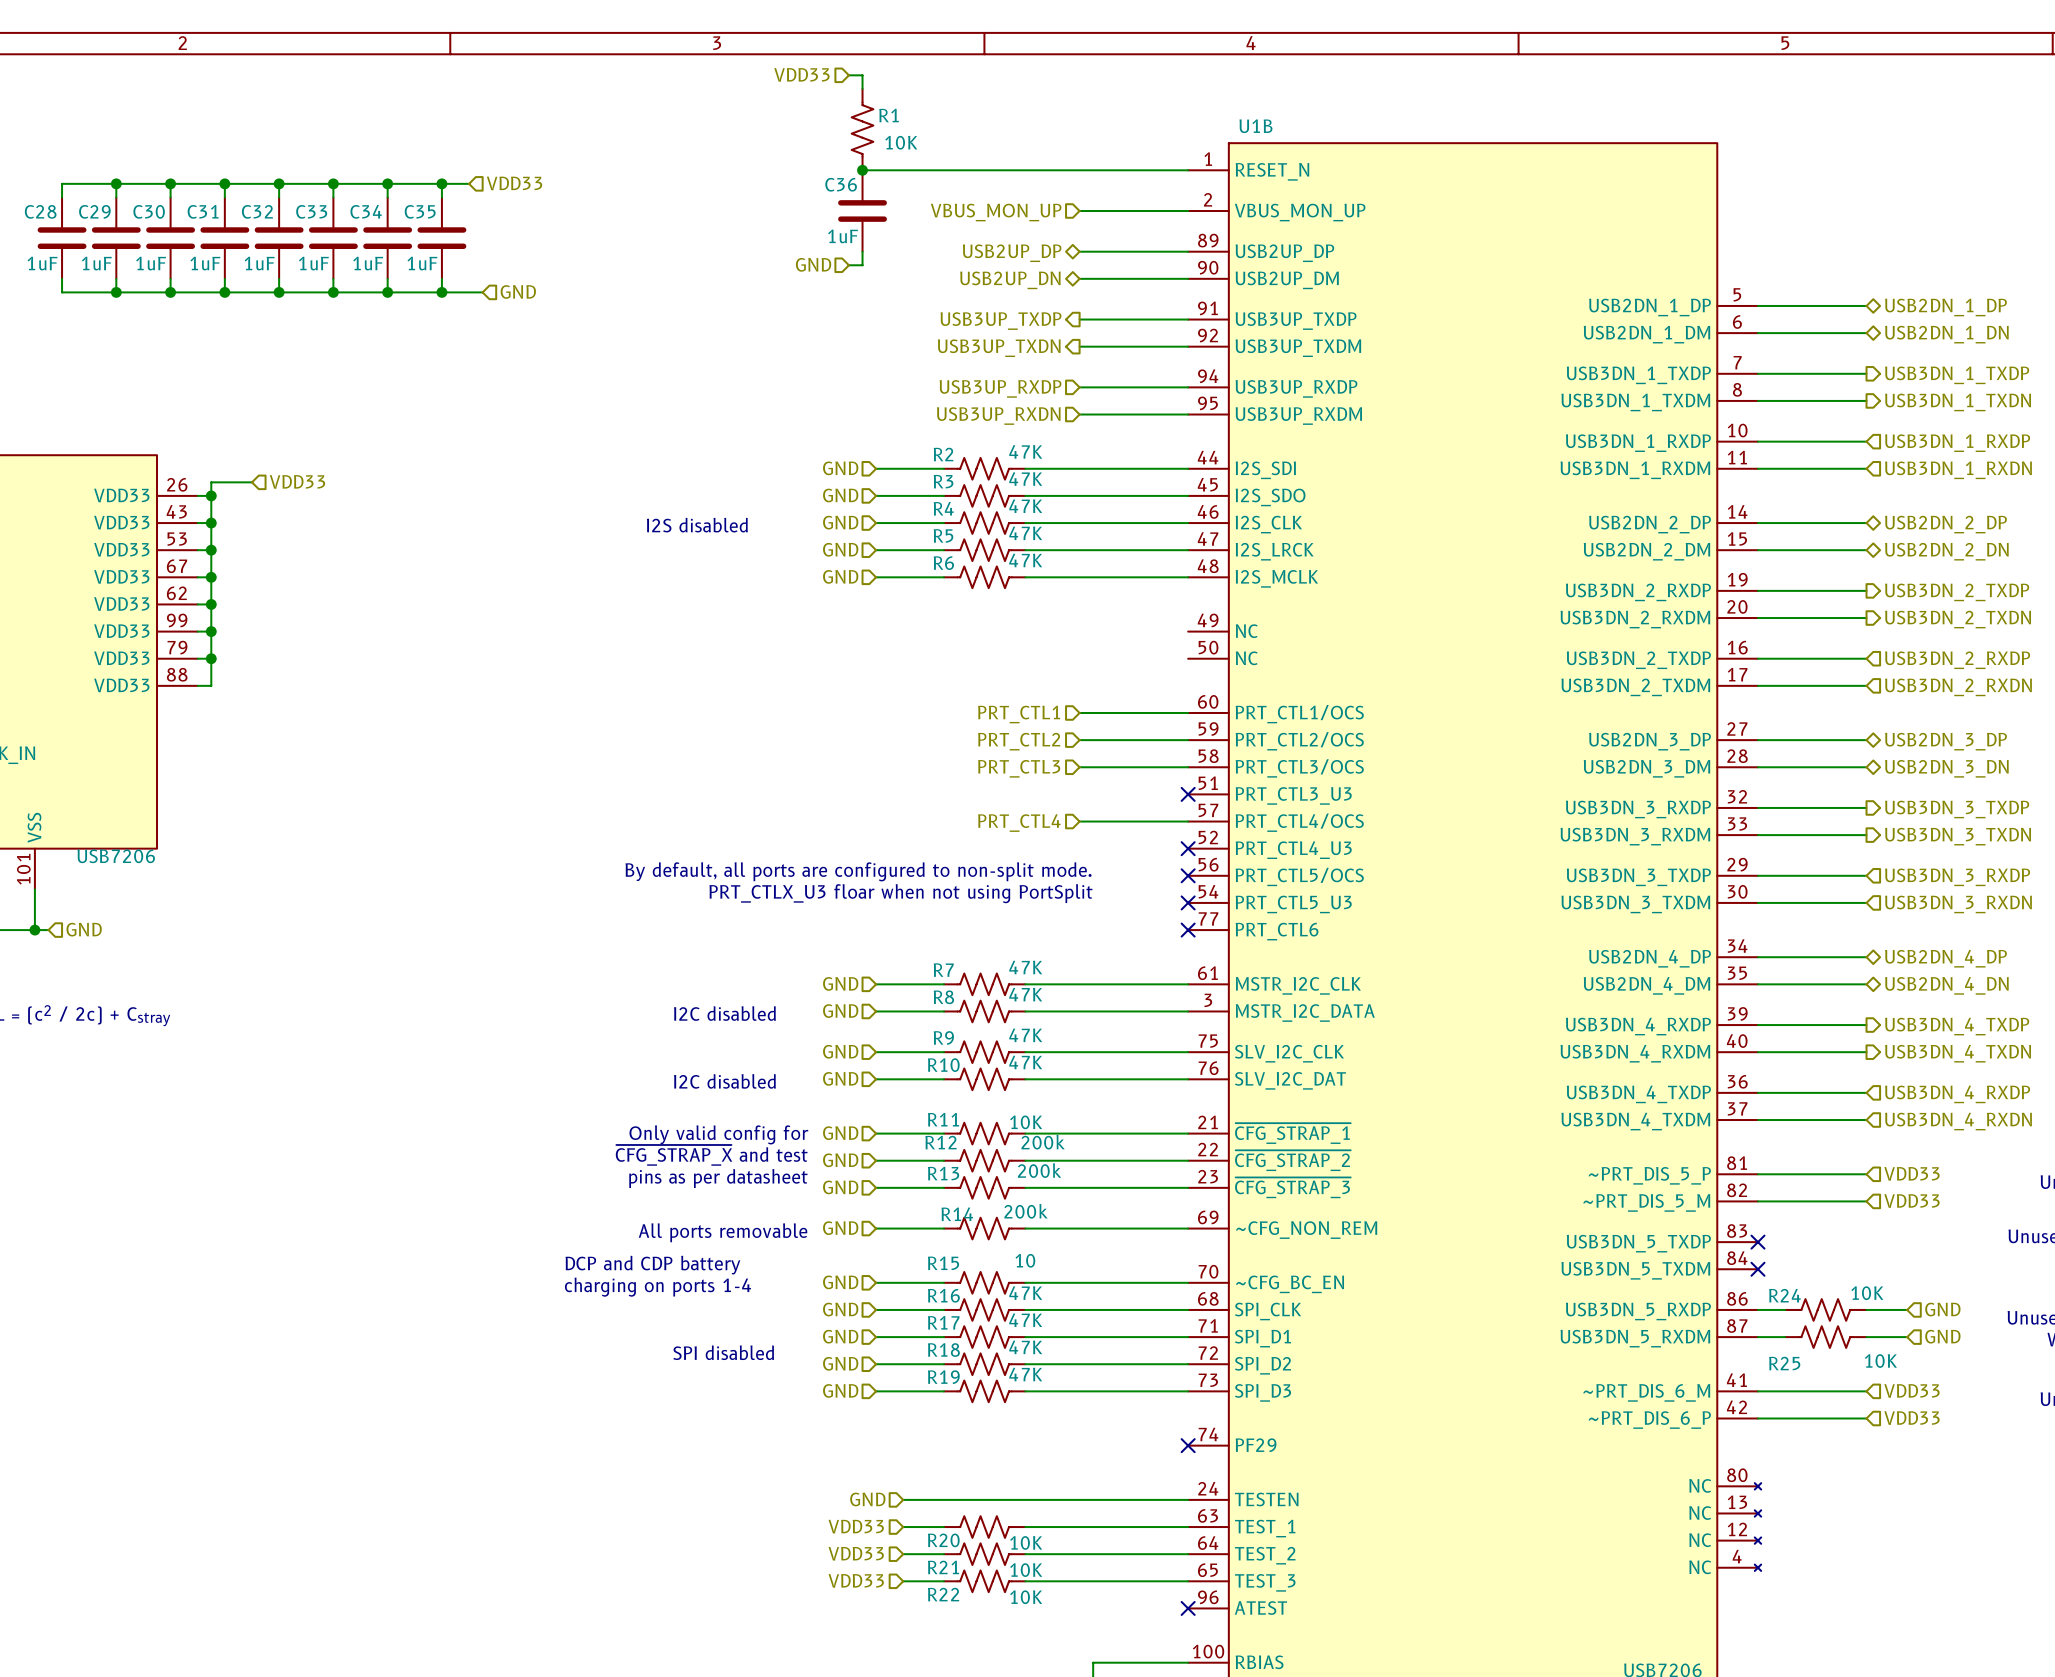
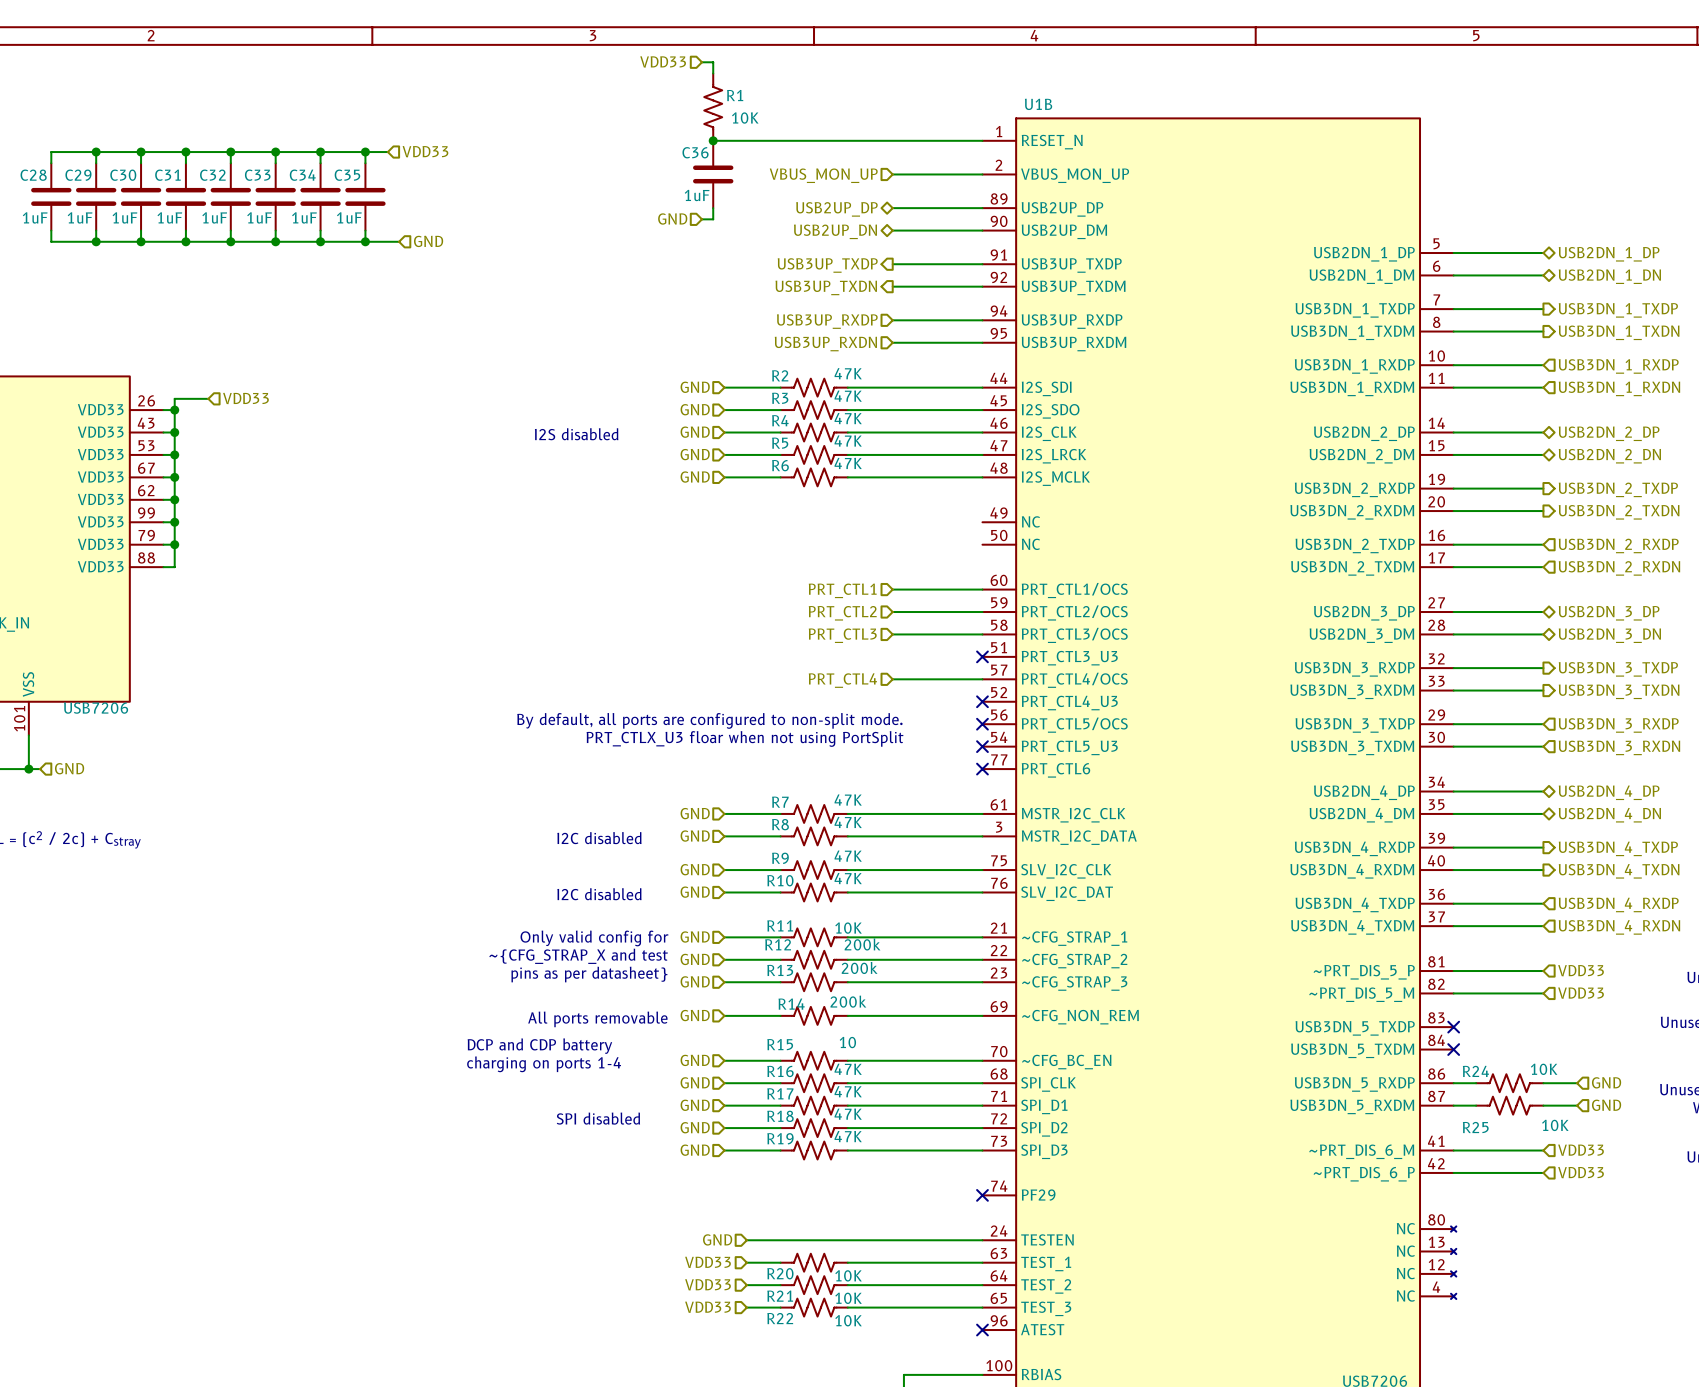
U1B pin name: ~{CFG_STRAP_1} (1292, 1133) -> ~CFG_STRAP_1 (1074, 938)
text: ~{CFG_STRAP_X} and test (711, 1155) -> ~{CFG_STRAP_X and test (578, 956)
U1B pin name: ~{CFG_STRAP_2} (1292, 1160) -> ~CFG_STRAP_2 (1074, 961)
text: pins as per datasheet (718, 1178) -> pins as per datasheet} (589, 974)
U1B pin name: ~{CFG_STRAP_3} (1292, 1187) -> ~CFG_STRAP_3 (1074, 983)

